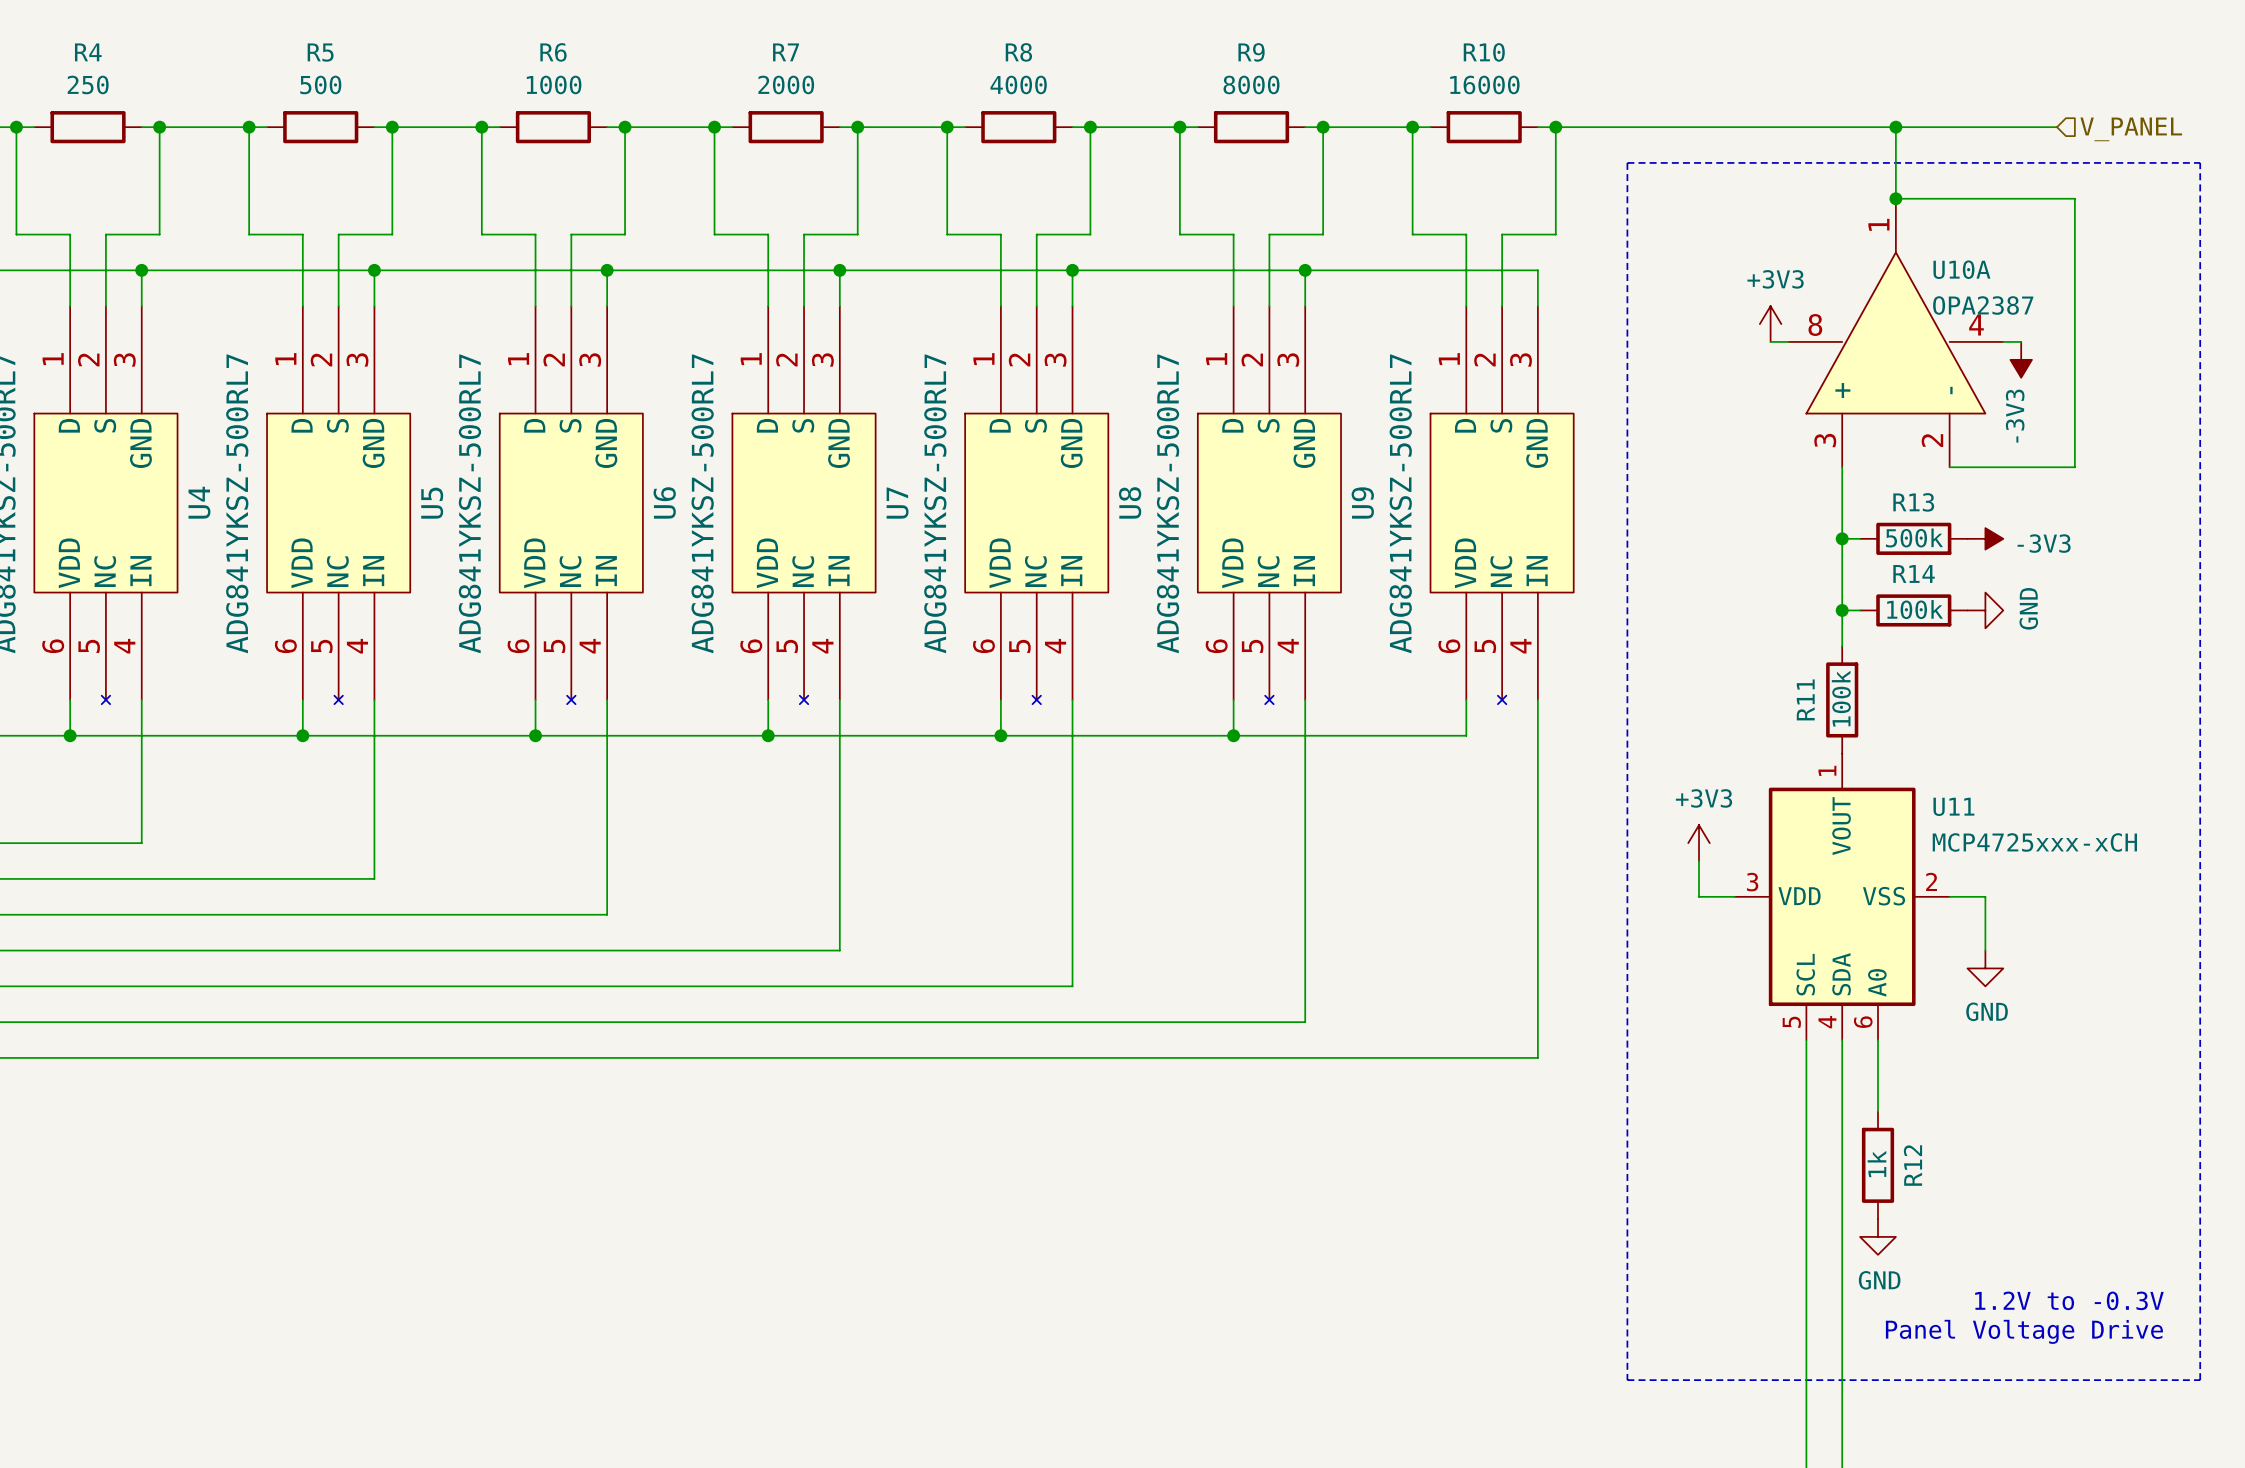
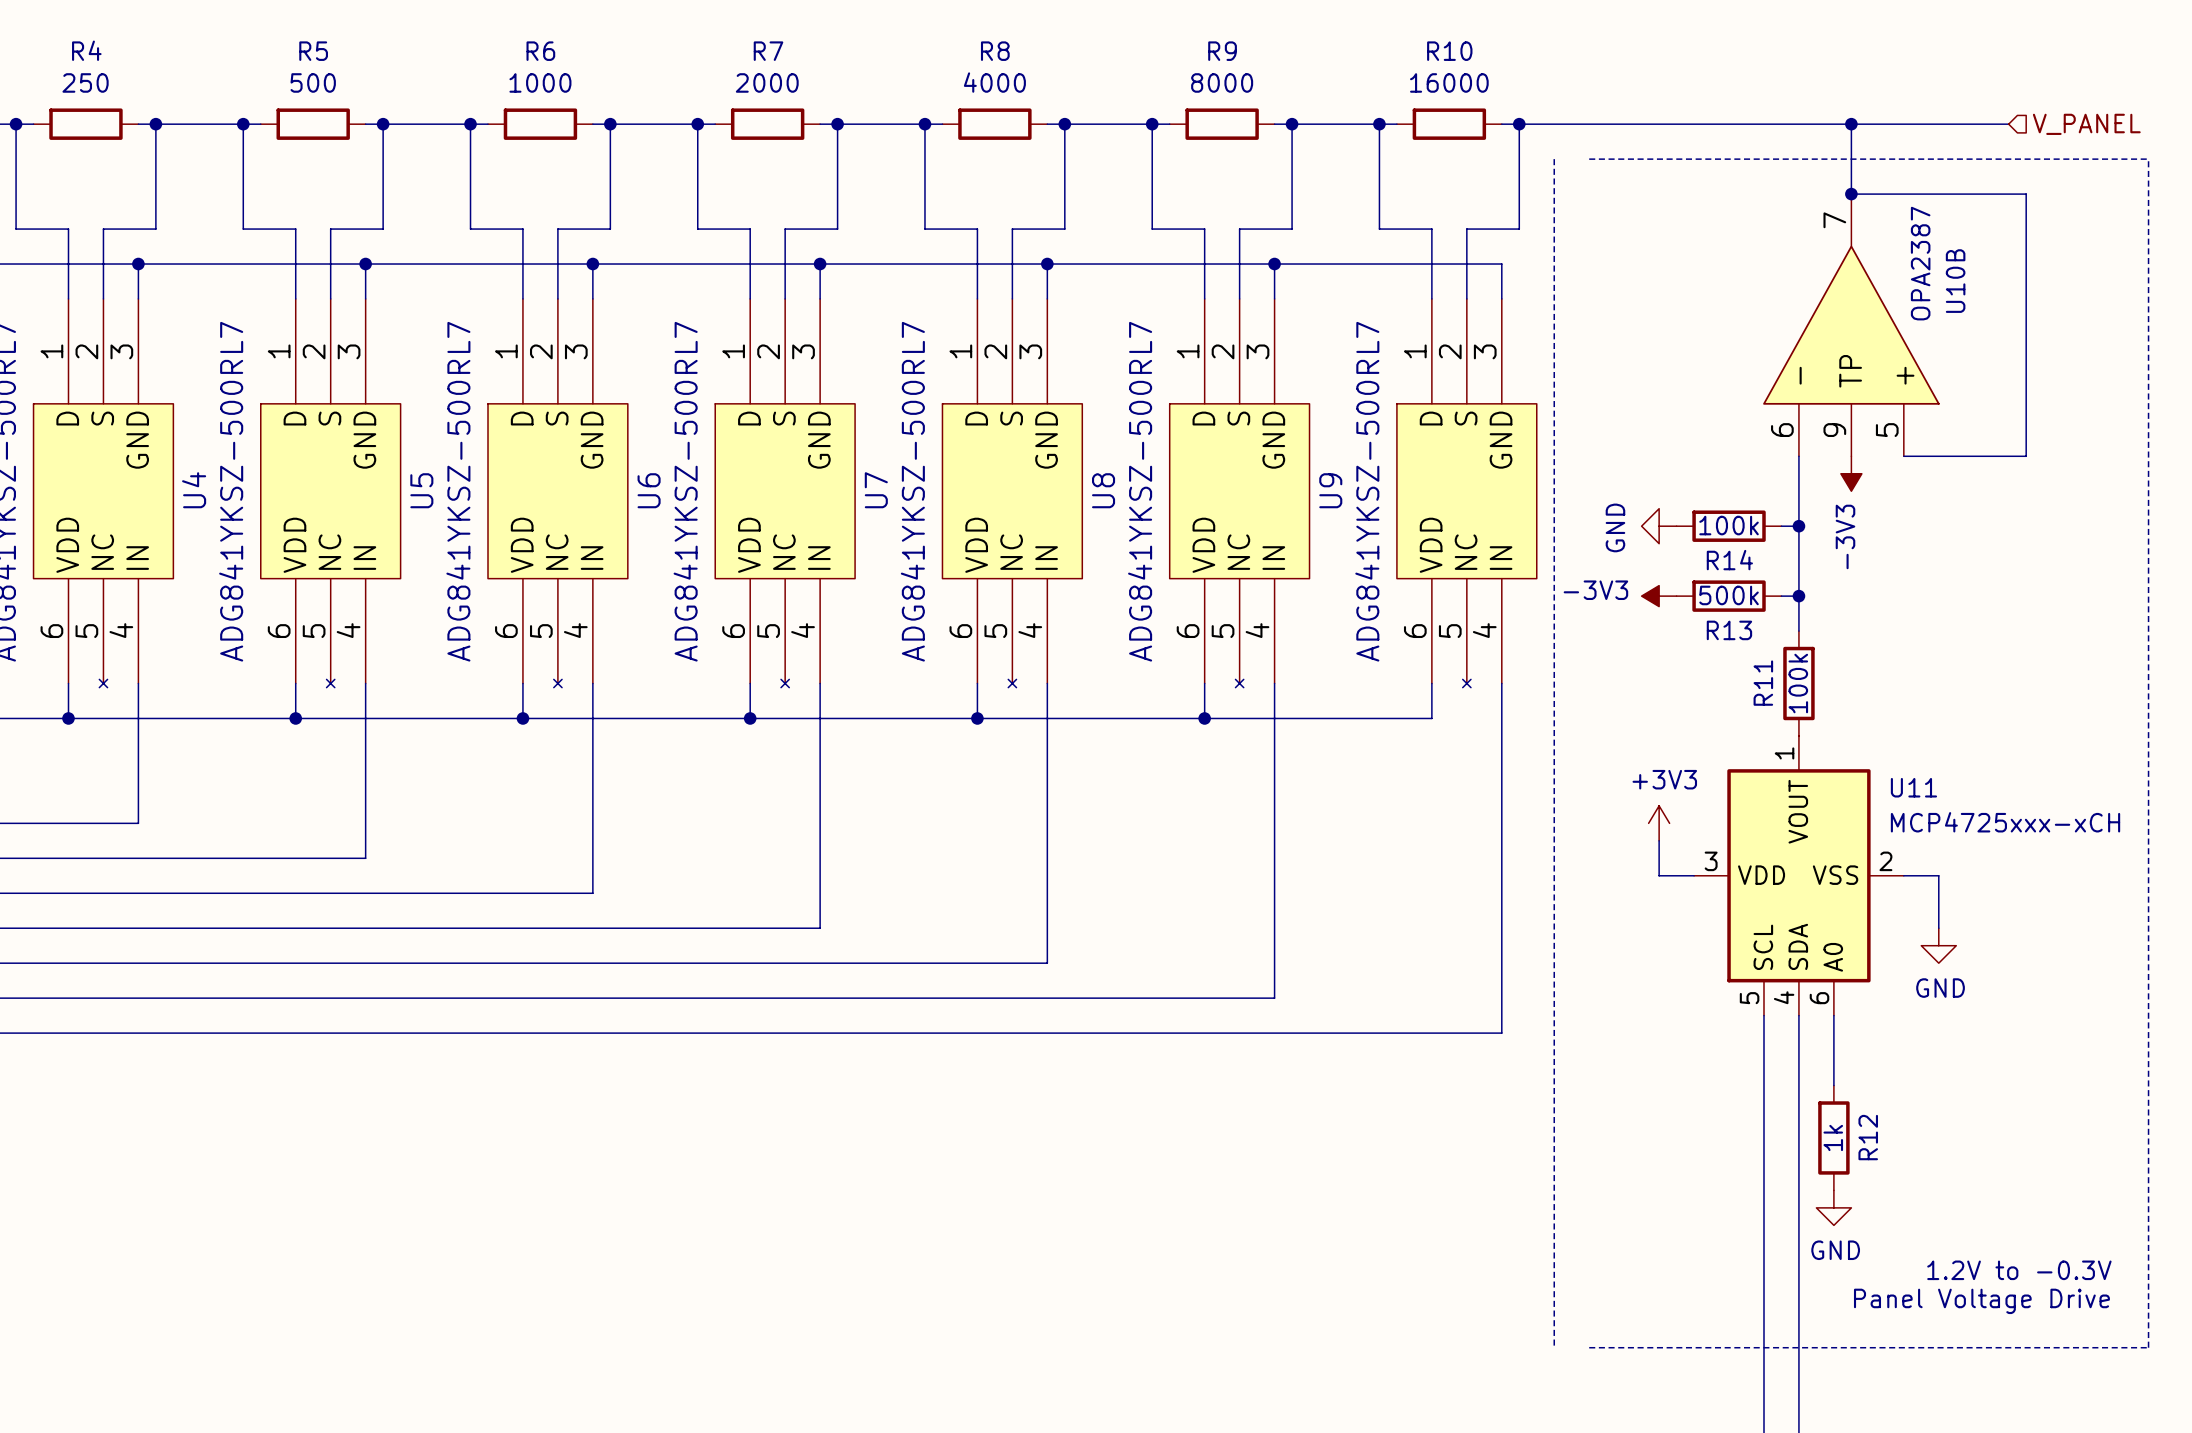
line: (1627, 162) (1627, 1380) -> (1554, 159) (1554, 1347)
power symbol: +3V3 (1770, 324) -> none
U10A: OPA2387 (1895, 333) -> none
U10B: none -> OPA2387 (1851, 325)
wire: (1770, 341) (1788, 341) -> none
wire: (2003, 341) (2021, 341) -> none
power symbol: -3V3 (2021, 359) -> none
power symbol: none -> -3V3 (1851, 473)
R13 name position: R13 (1913, 502) -> R13 (1729, 630)
wire: (1842, 538) (1860, 538) -> (1798, 526) (1781, 526)
R13 position: (1913, 538) -> (1729, 596)
power symbol: -3V3 (1985, 538) -> none
R14 name position: R14 (1914, 573) -> R14 (1729, 560)
power symbol: none -> -3V3 (1659, 596)
wire: (1842, 610) (1860, 610) -> (1798, 596) (1781, 596)
R14 position: (1913, 610) -> (1729, 526)
power symbol rotation: 0° (1985, 610) -> 180° (1659, 526)
power symbol position: GND (1985, 610) -> GND (1659, 526)

